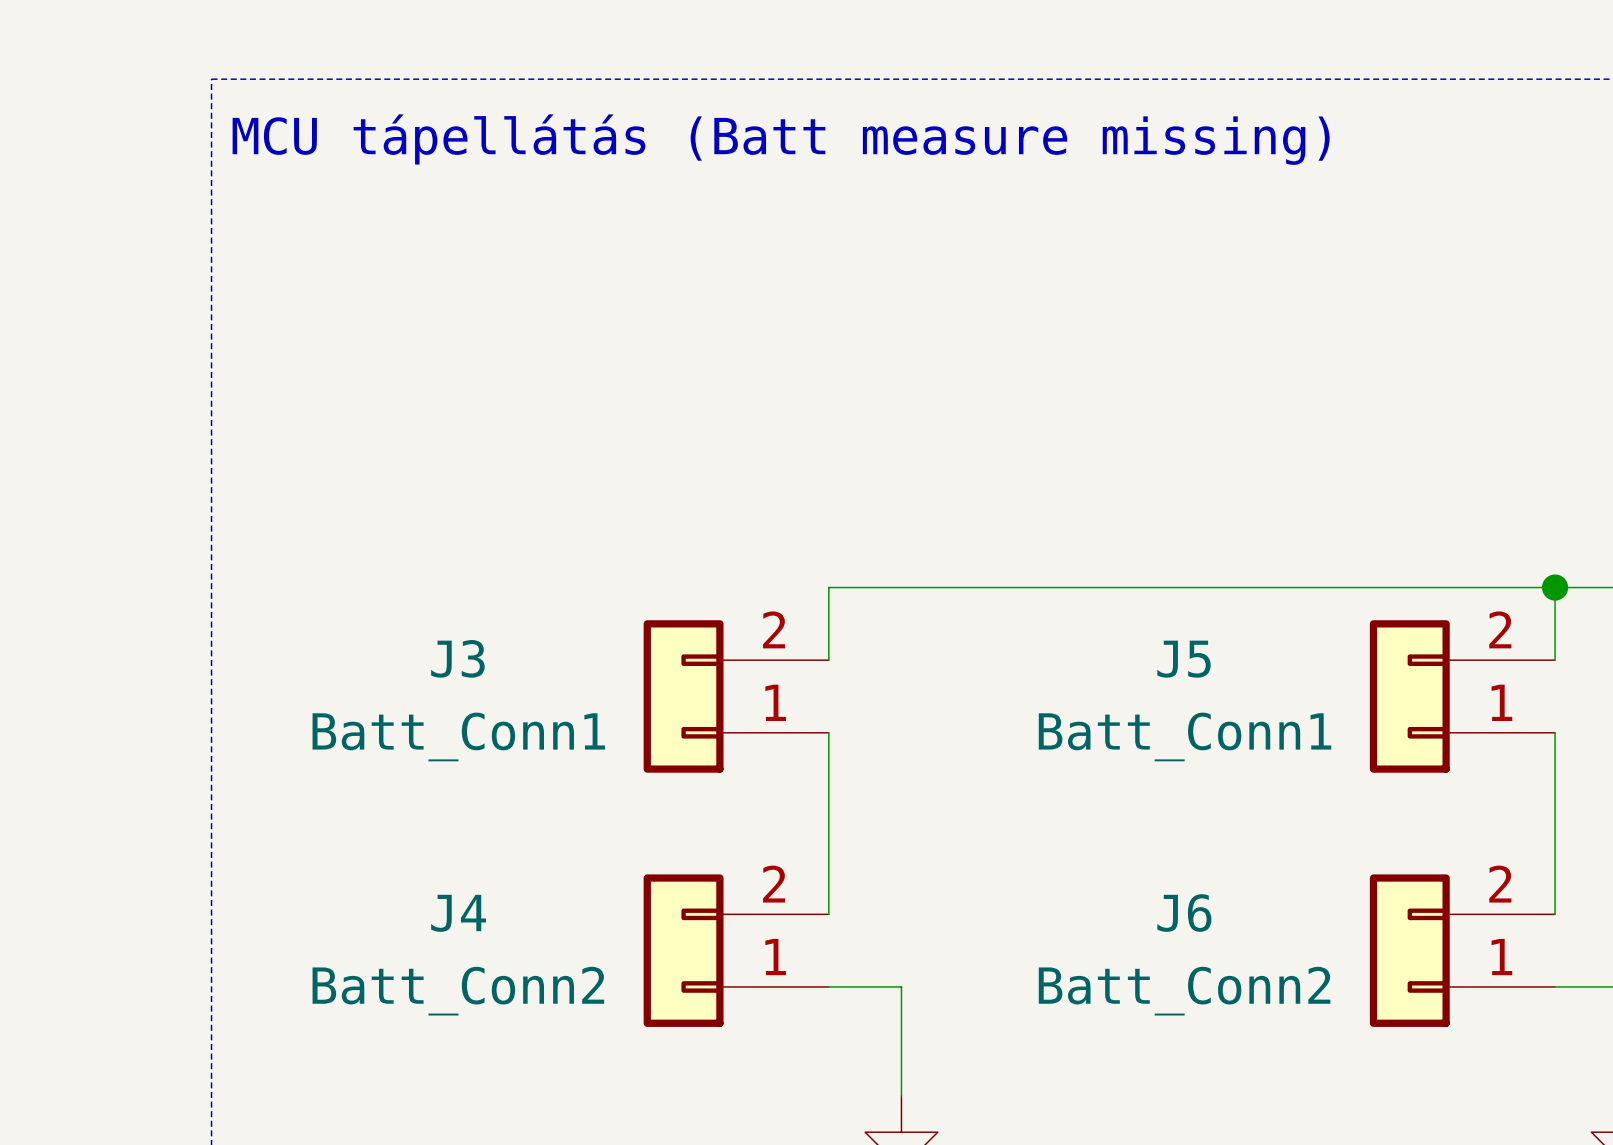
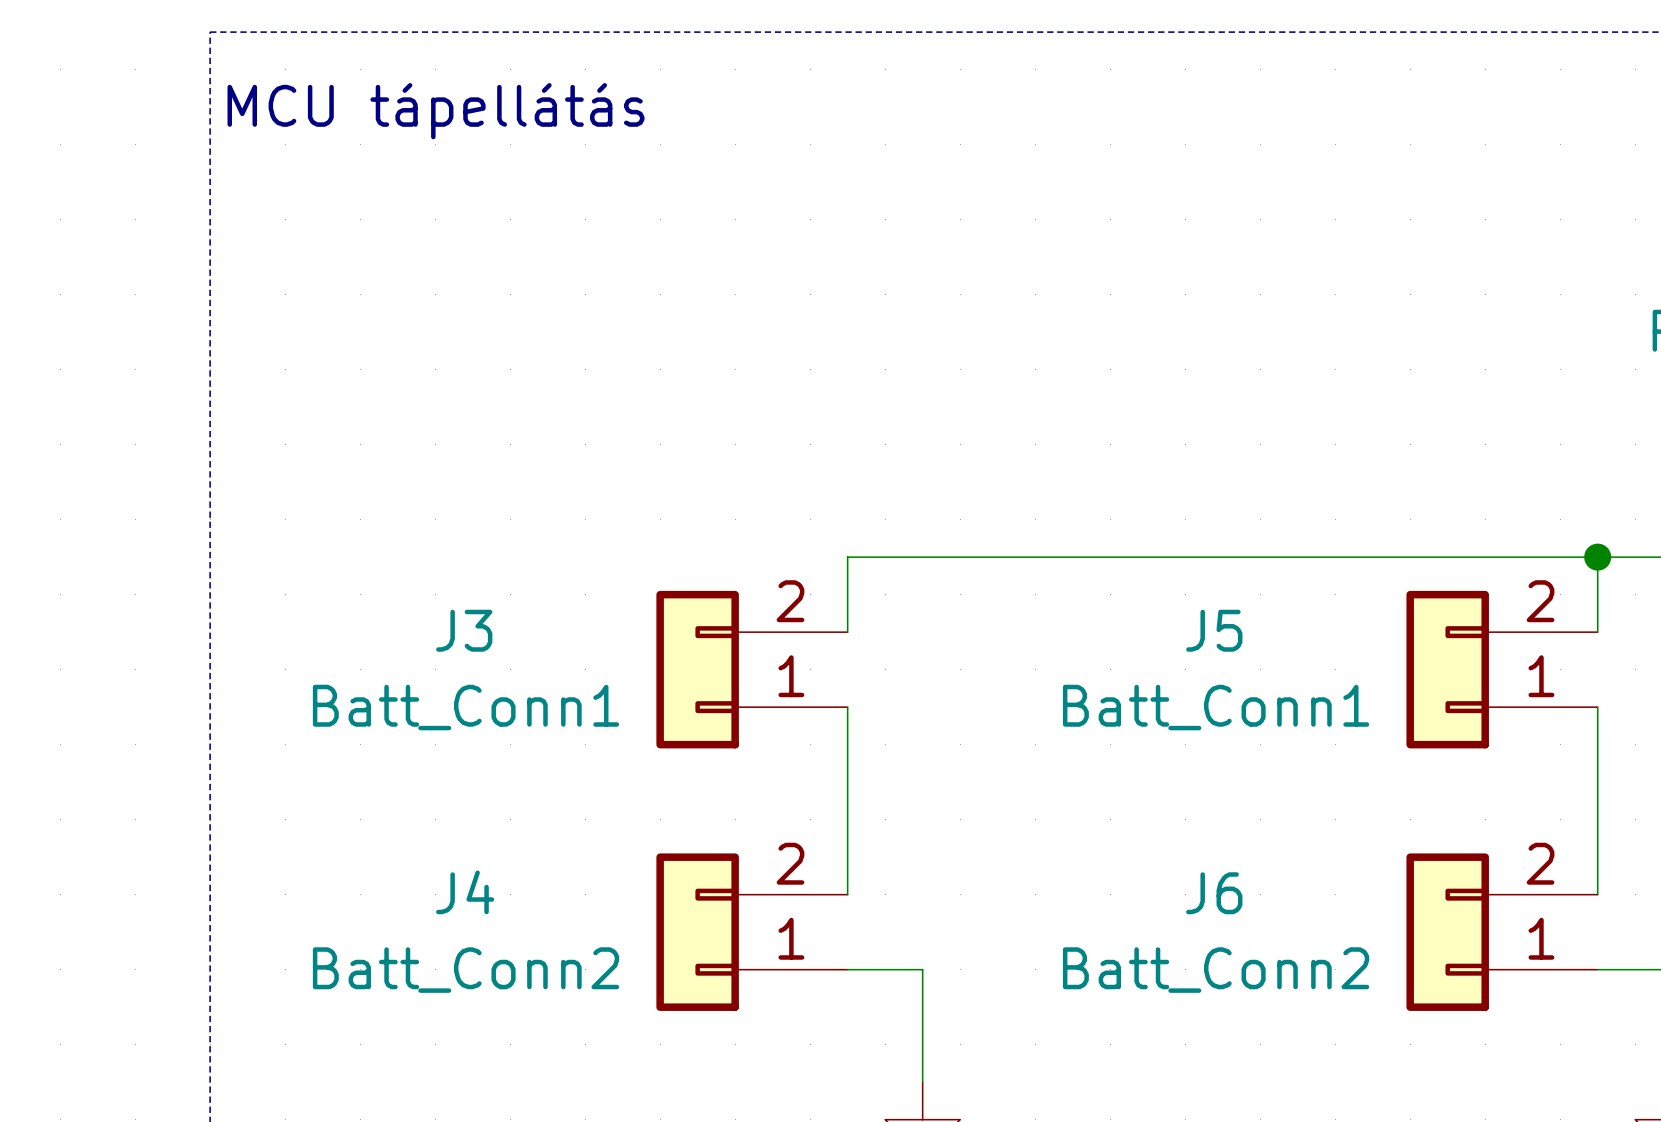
text: MCU tápellátás (Batt measure missing) (781, 139) -> none
text: none -> MCU tápellátás (436, 111)

